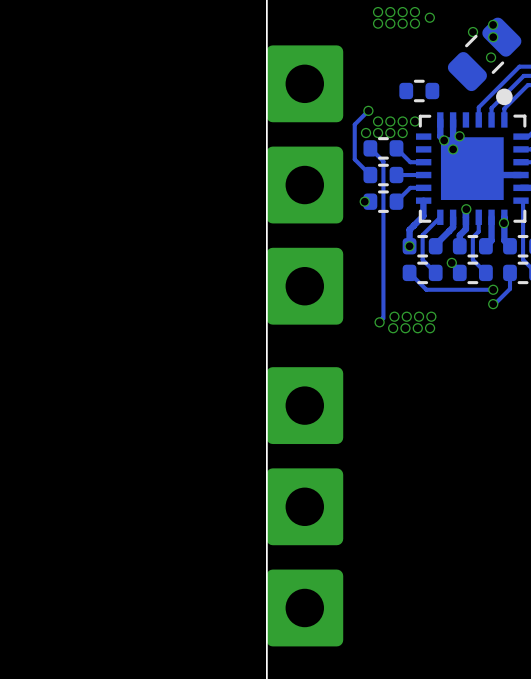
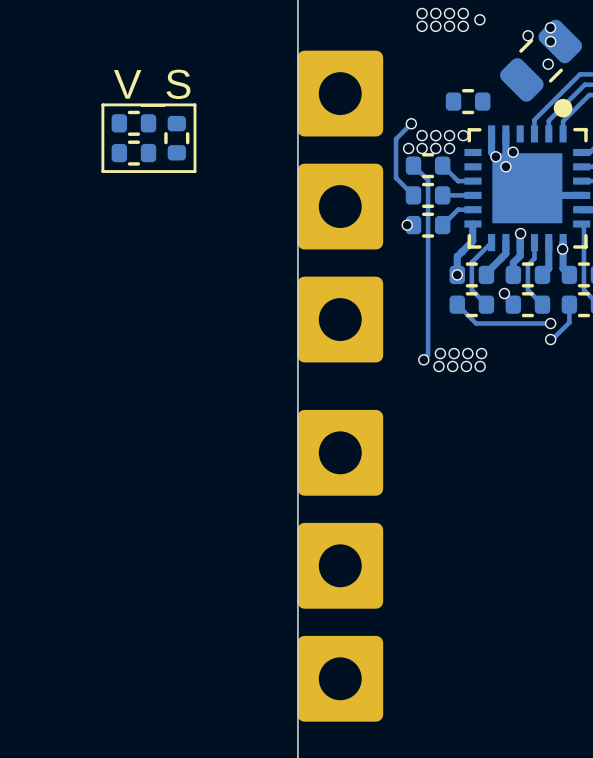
text: none -> V_S (152, 88)
line: none -> (194, 104) (102, 104) (102, 171) (194, 171) (194, 104)
part: none -> (133, 123)
part: none -> (176, 138)
part: none -> (133, 153)

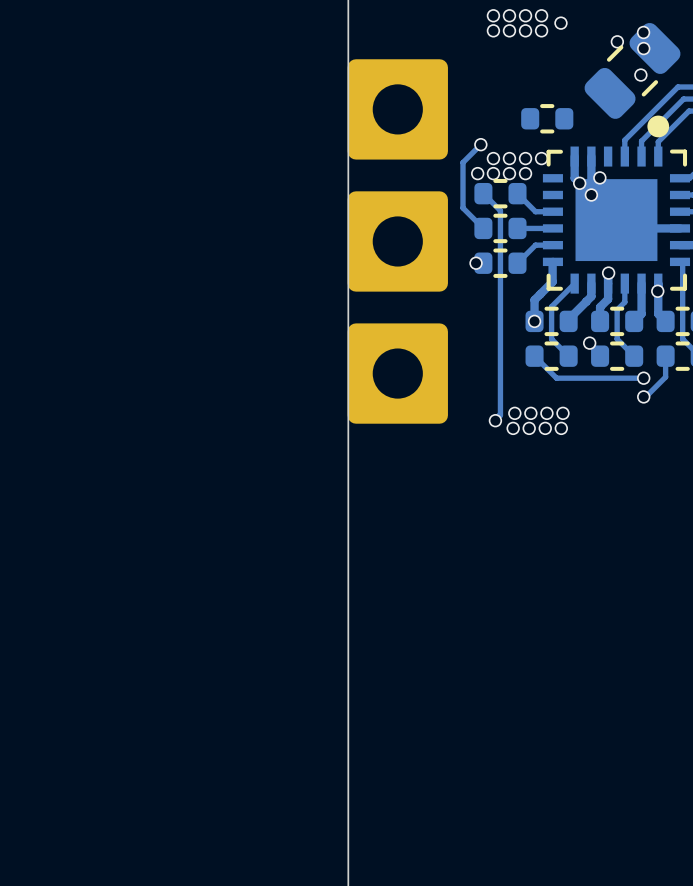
text: V_S (152, 88) -> none
line: (194, 104) (102, 104) (102, 171) (194, 171) (194, 104) -> none
part: (133, 123) -> none
part: (176, 138) -> none
part: (133, 153) -> none
part: (340, 452) -> none
part: (340, 565) -> none
part: (340, 678) -> none

